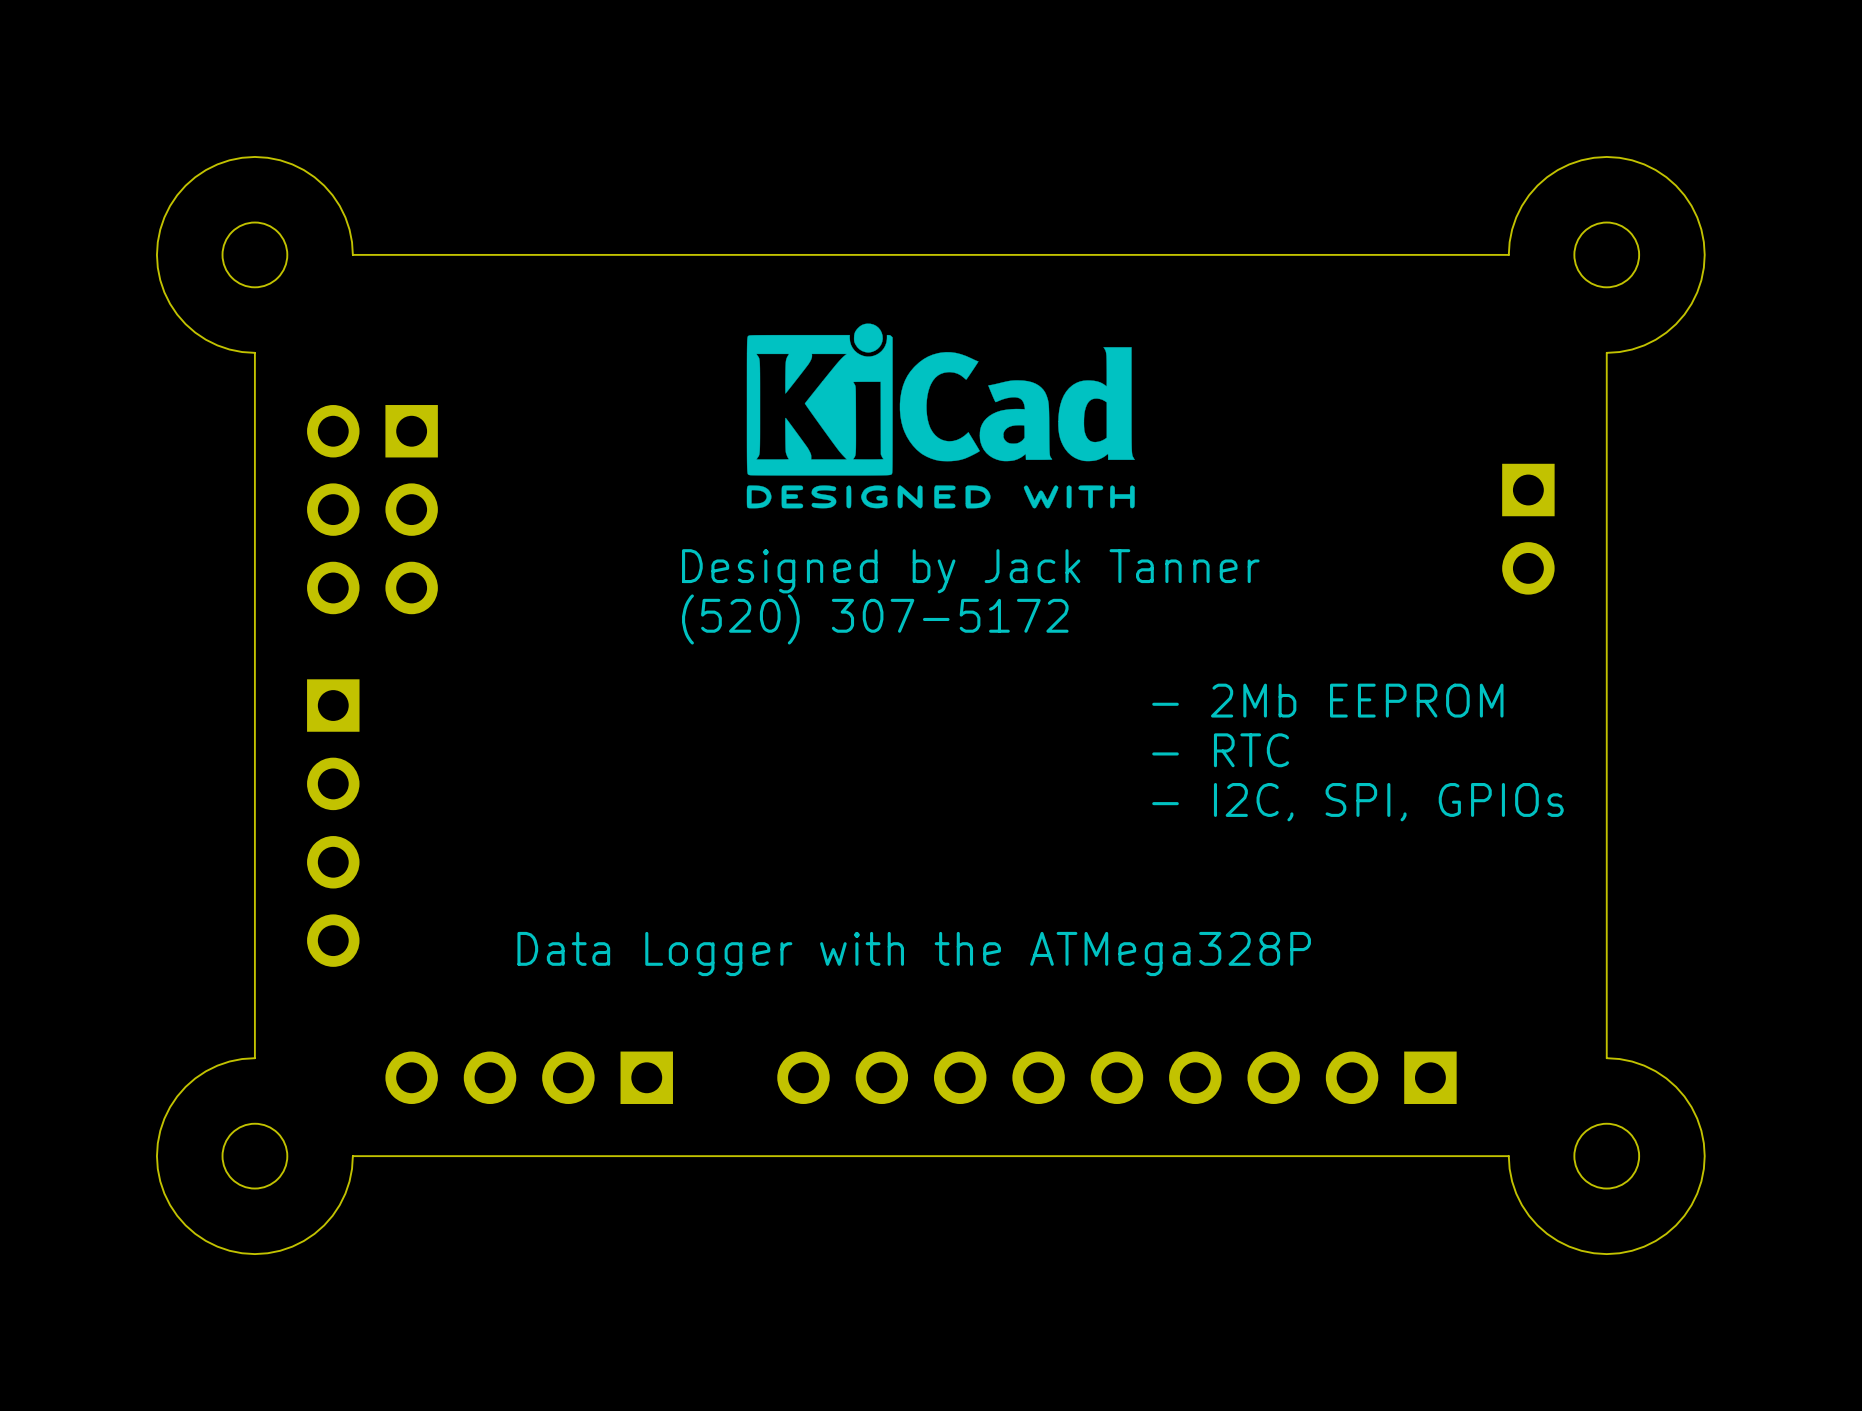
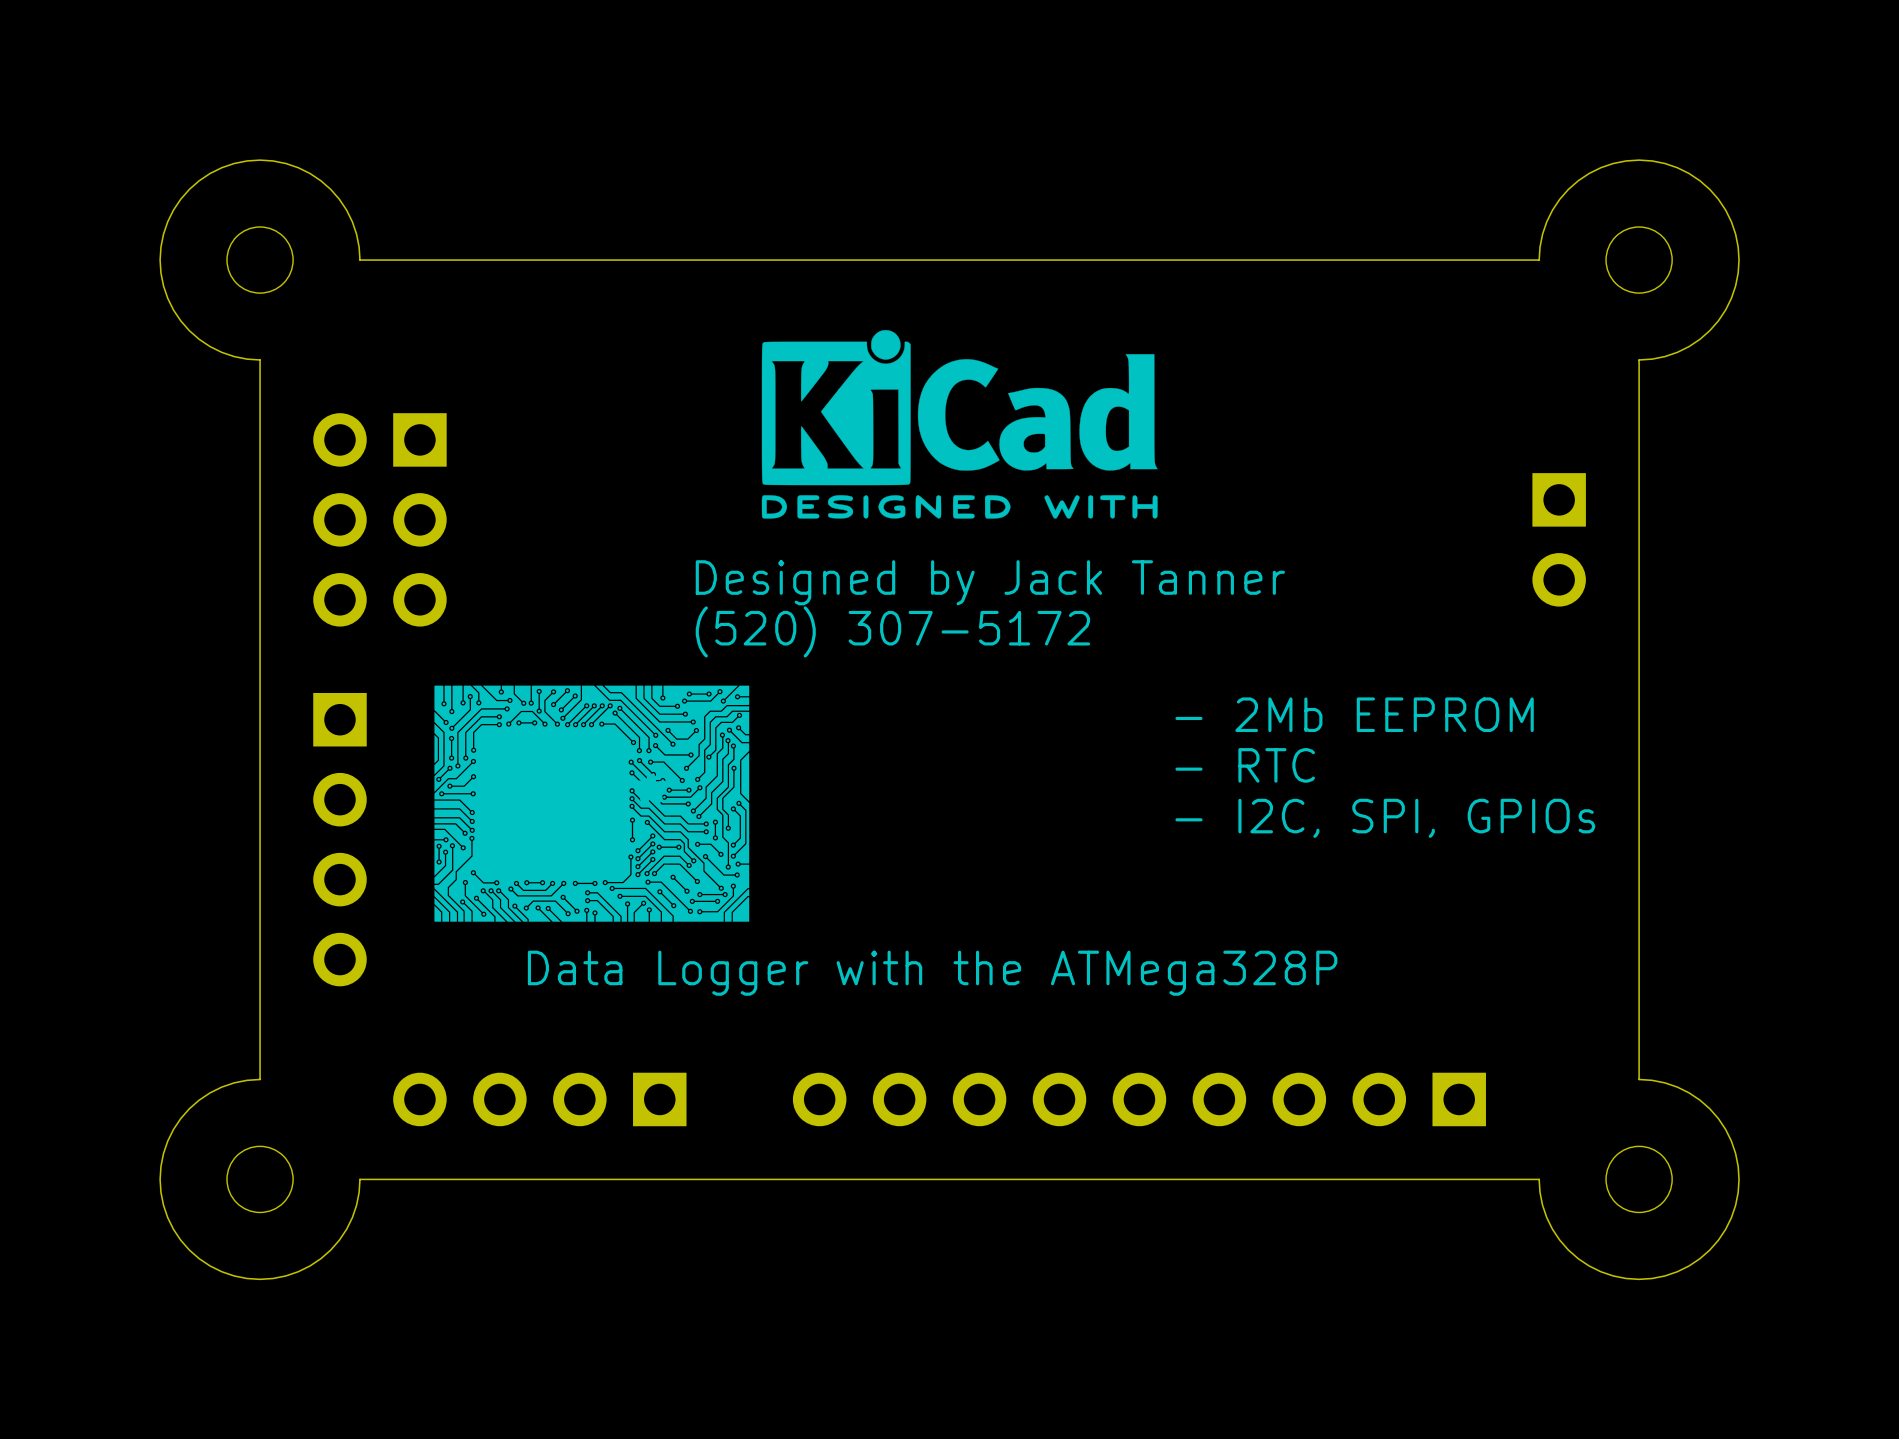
part: none -> (591, 803)

